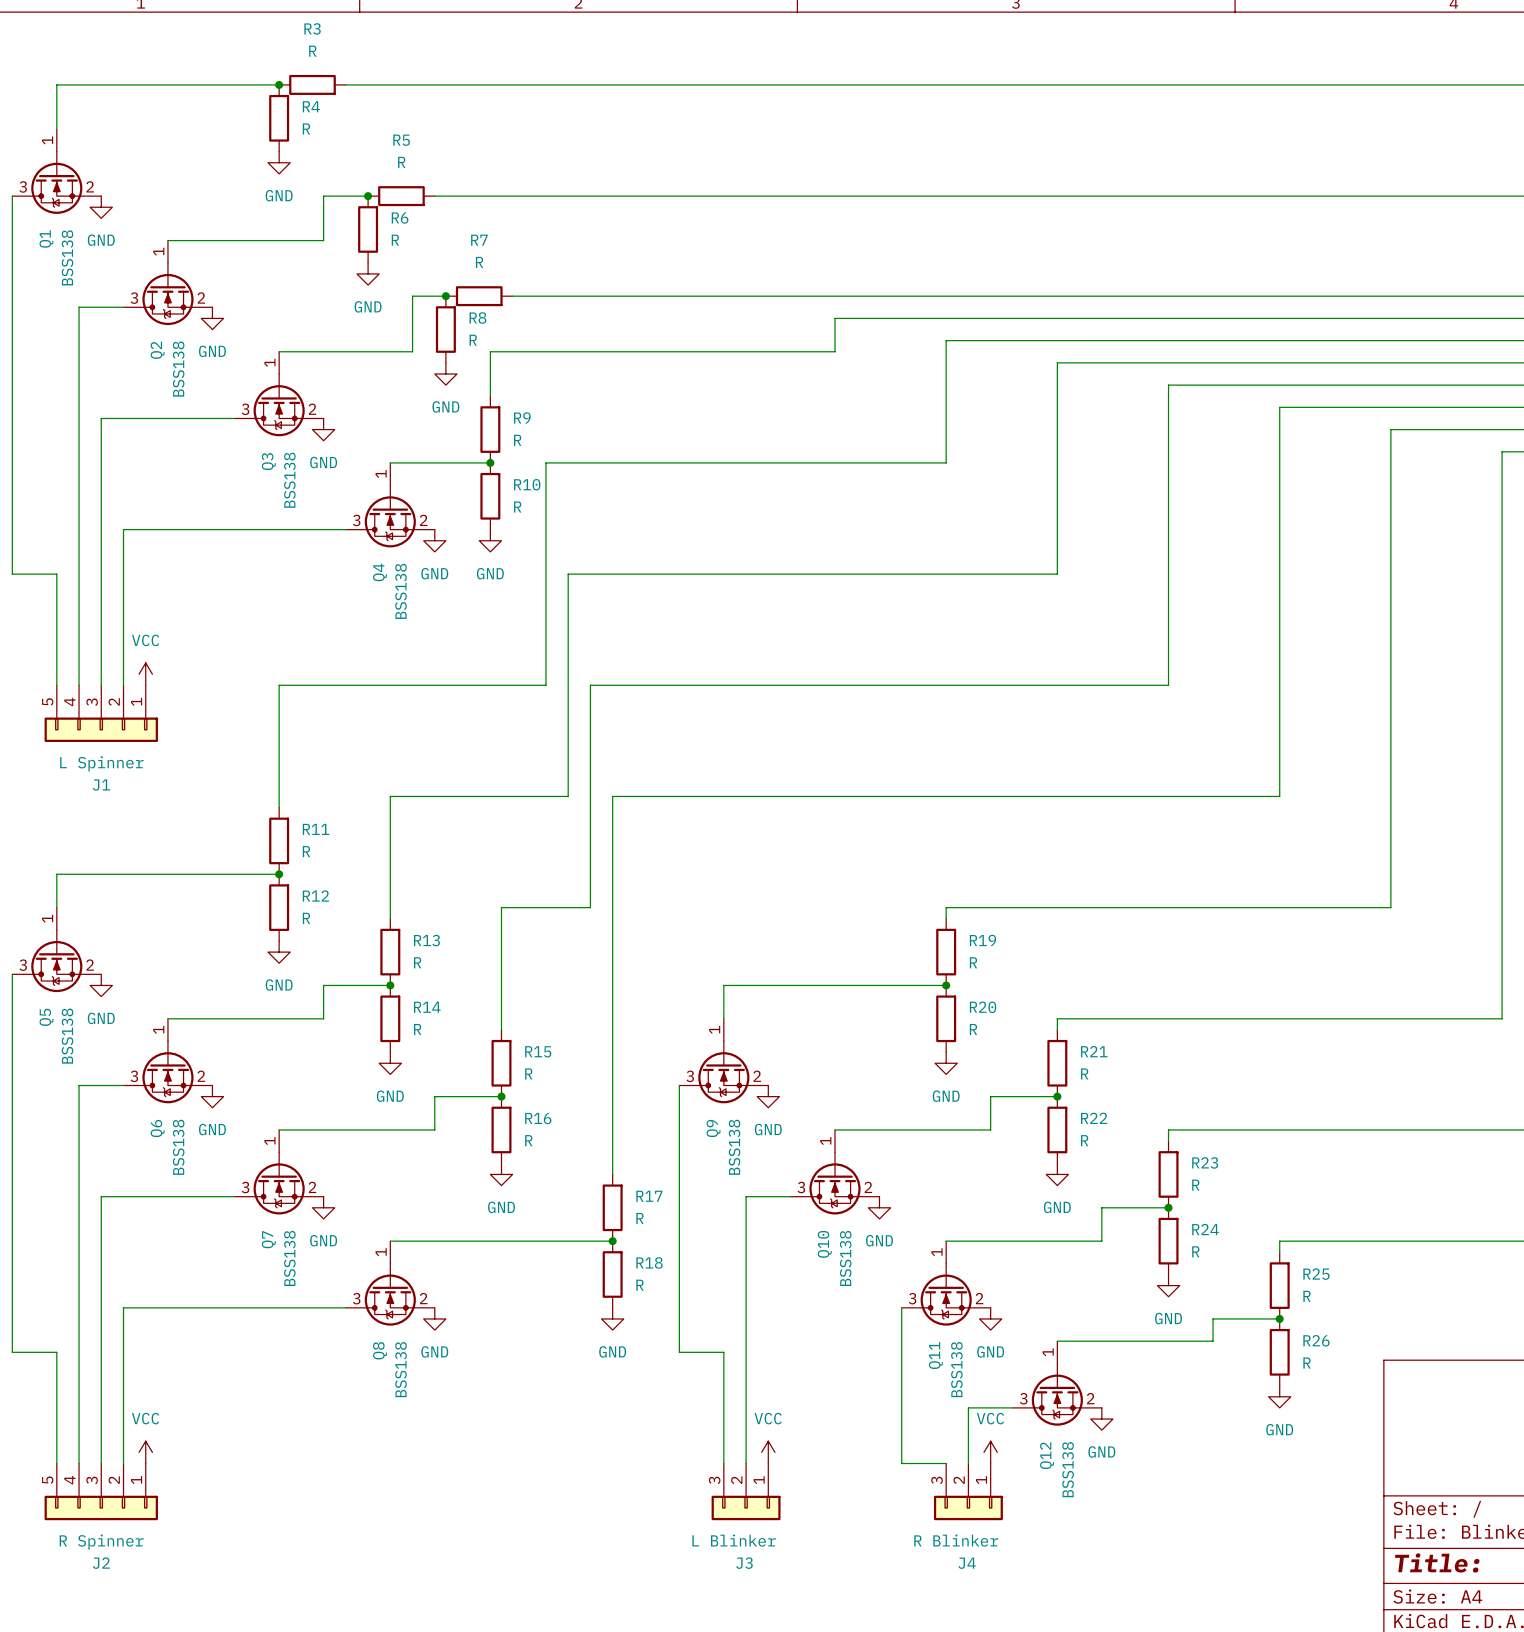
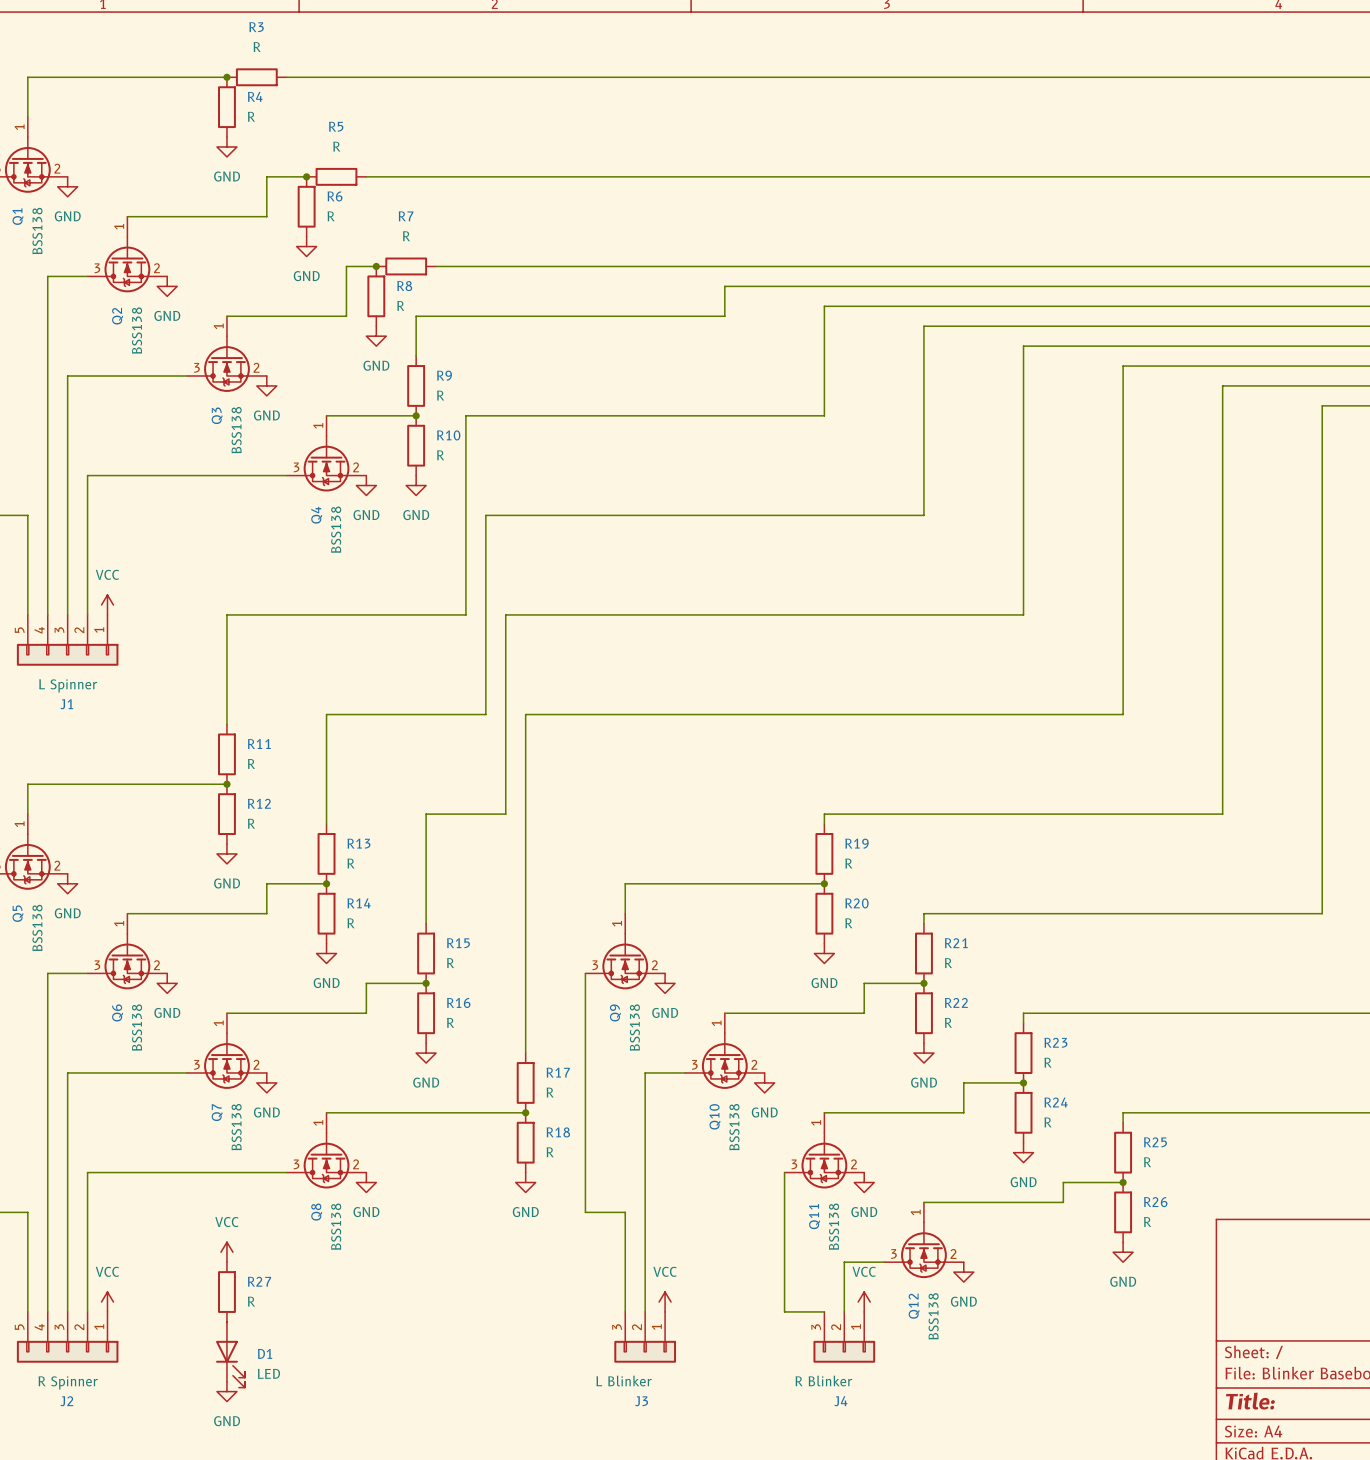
power symbol: none -> VCC (226, 1252)
R27: none -> R (226, 1292)
D1: none -> LED (230, 1354)
power symbol: none -> GND (226, 1391)

